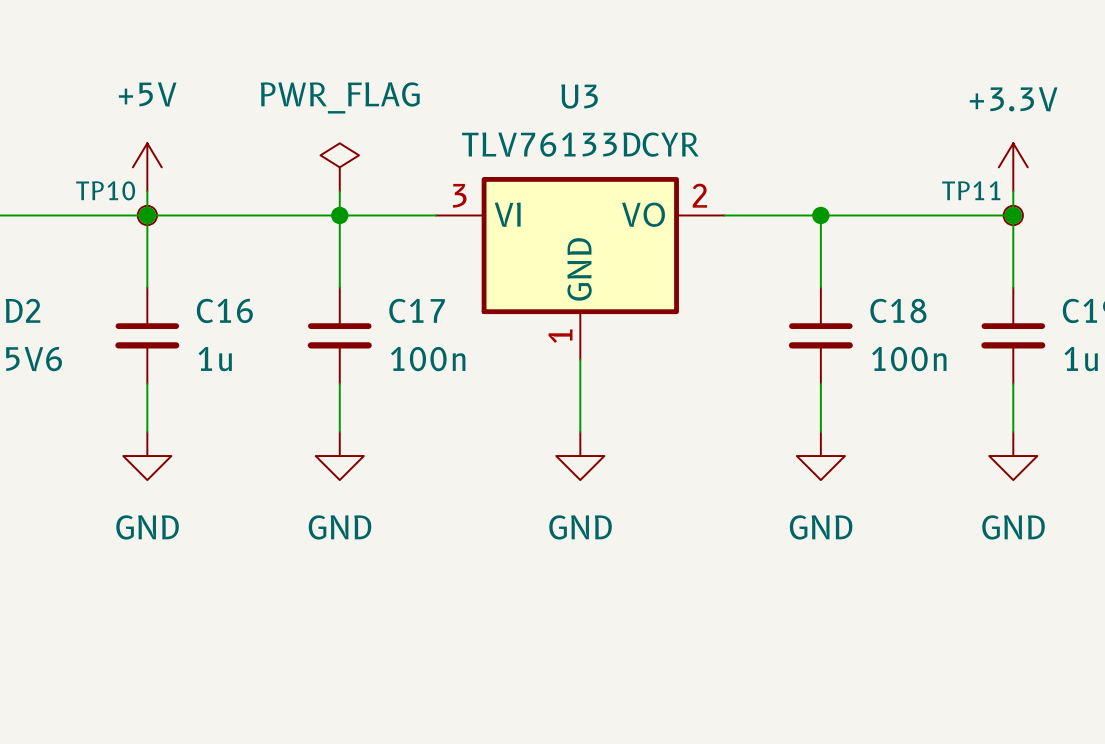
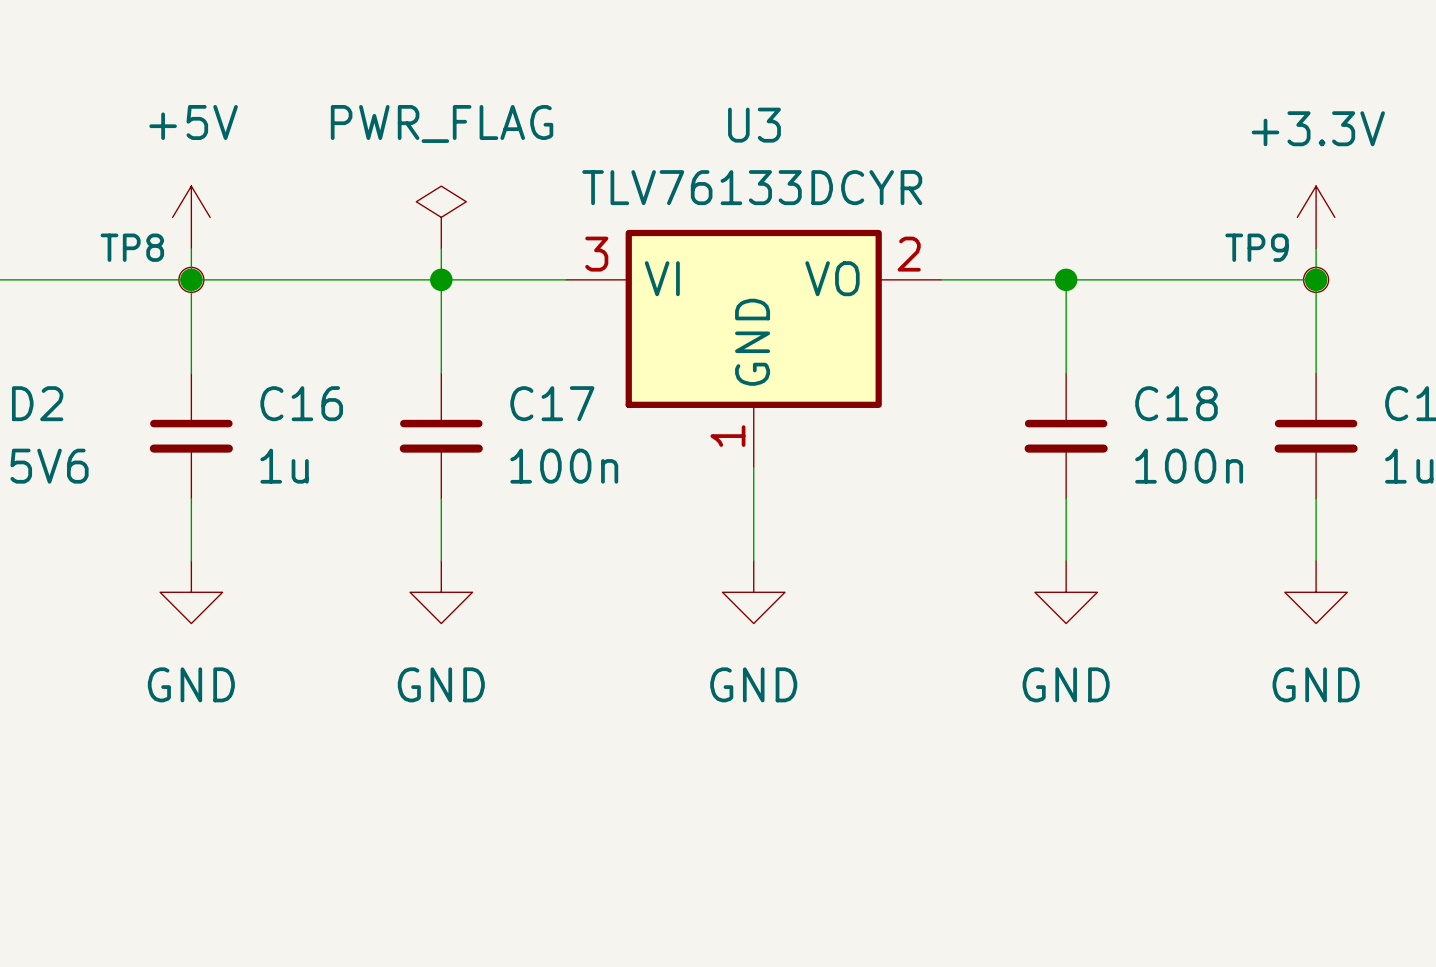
TP10 name: TP10 (105, 190) -> TP8 (132, 247)
TP11 name: TP11 (971, 190) -> TP9 (1257, 247)

